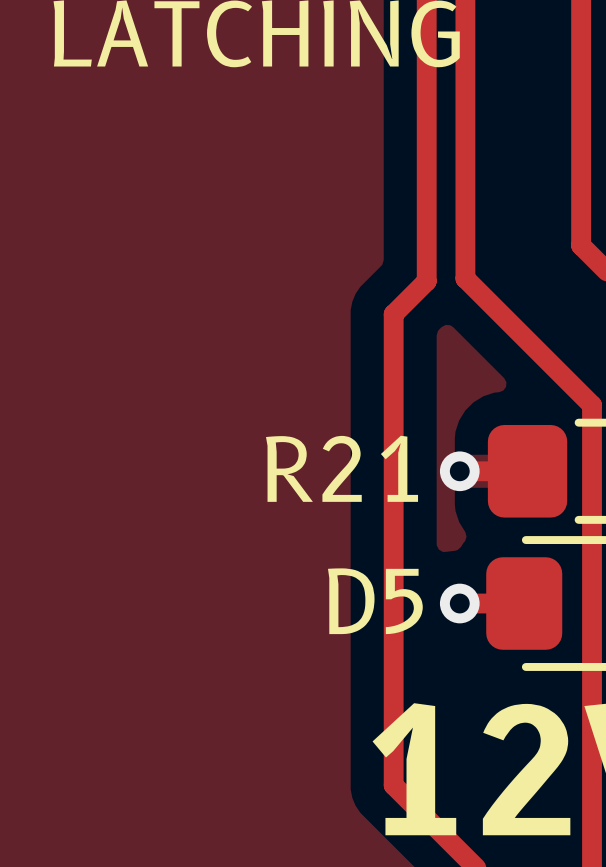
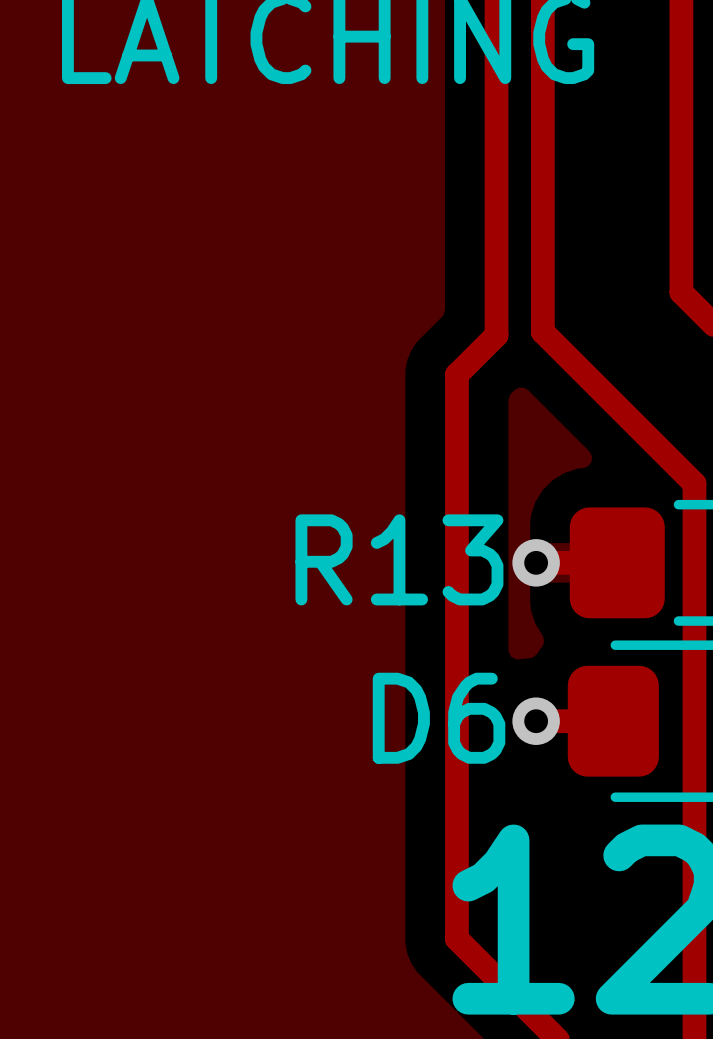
R21 name: R21 (342, 468) -> R13 (399, 559)
D5 name: D5 (375, 601) -> D6 (439, 718)

